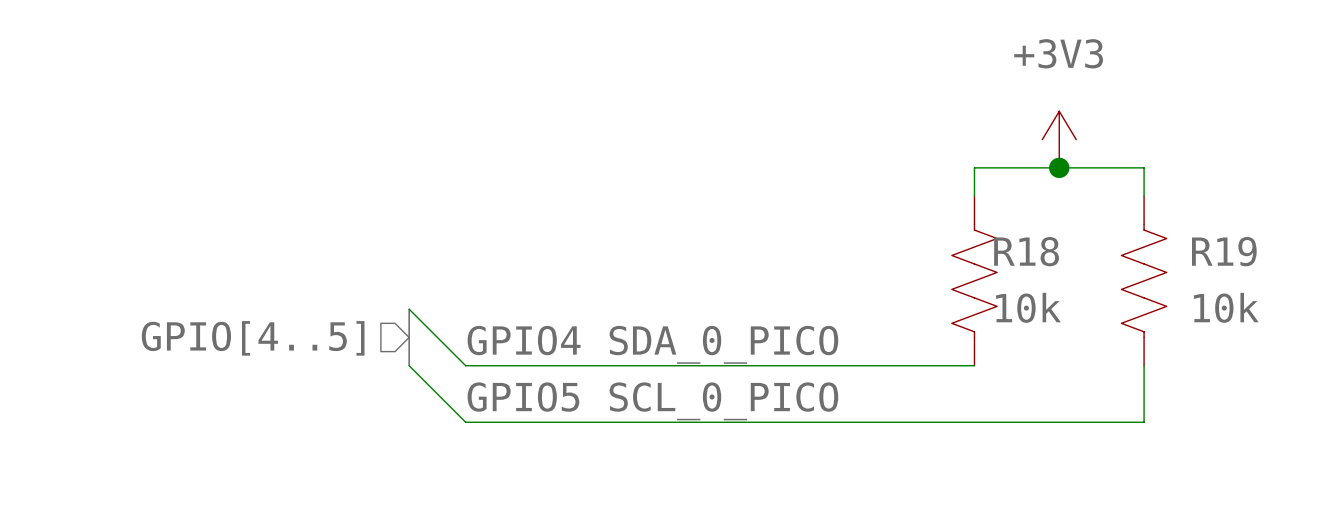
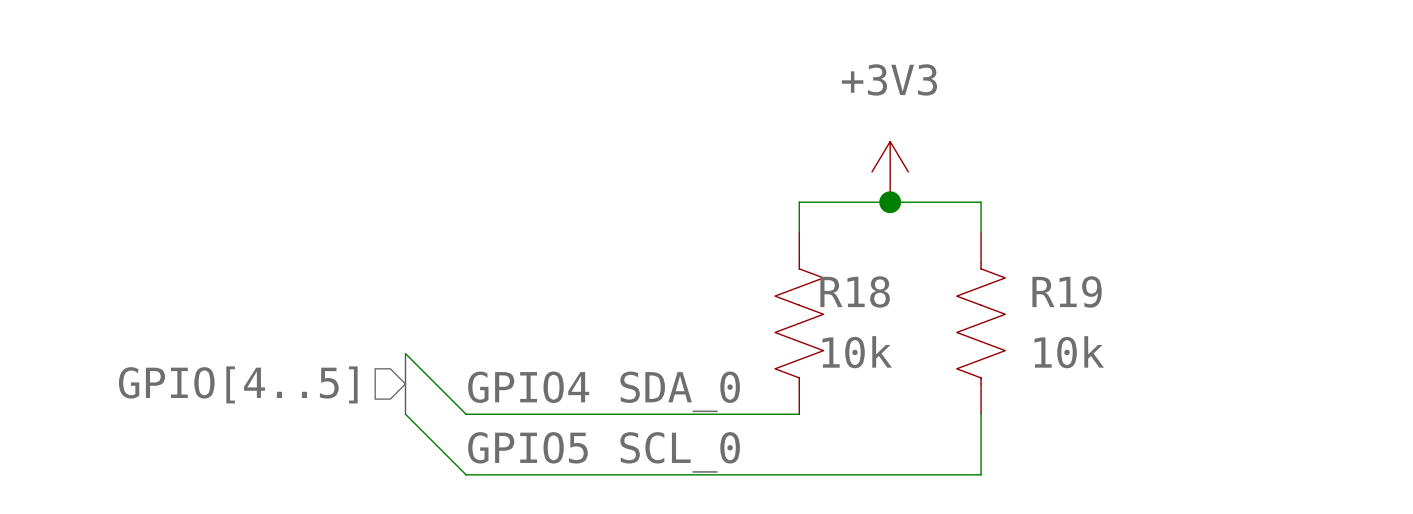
power symbol position: +3V3 (1059, 139) -> +3V3 (890, 171)
junction: none -> (890, 202)
junction: (1059, 167) -> none
wire: (974, 196) (974, 167) (1144, 167) (1144, 196) -> (799, 232) (799, 202) (981, 202) (981, 232)
R18 position: (974, 280) -> (799, 323)
R19 position: (1144, 280) -> (981, 323)
label: SDA_0_PICO (723, 344) -> SDA_0 (680, 391)
wire: (776, 365) (974, 365) -> none
wire: (1144, 365) (1144, 422) (946, 422) -> (981, 414) (981, 474)
label: SCL_0_PICO (723, 401) -> SCL_0 (680, 452)

